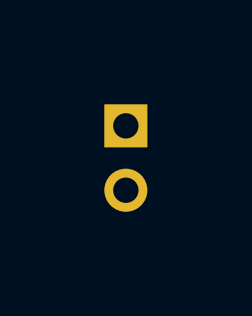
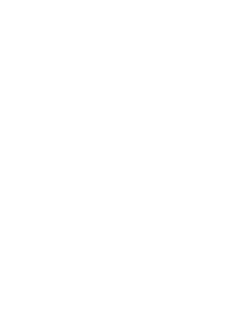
part: (125, 158) -> none

